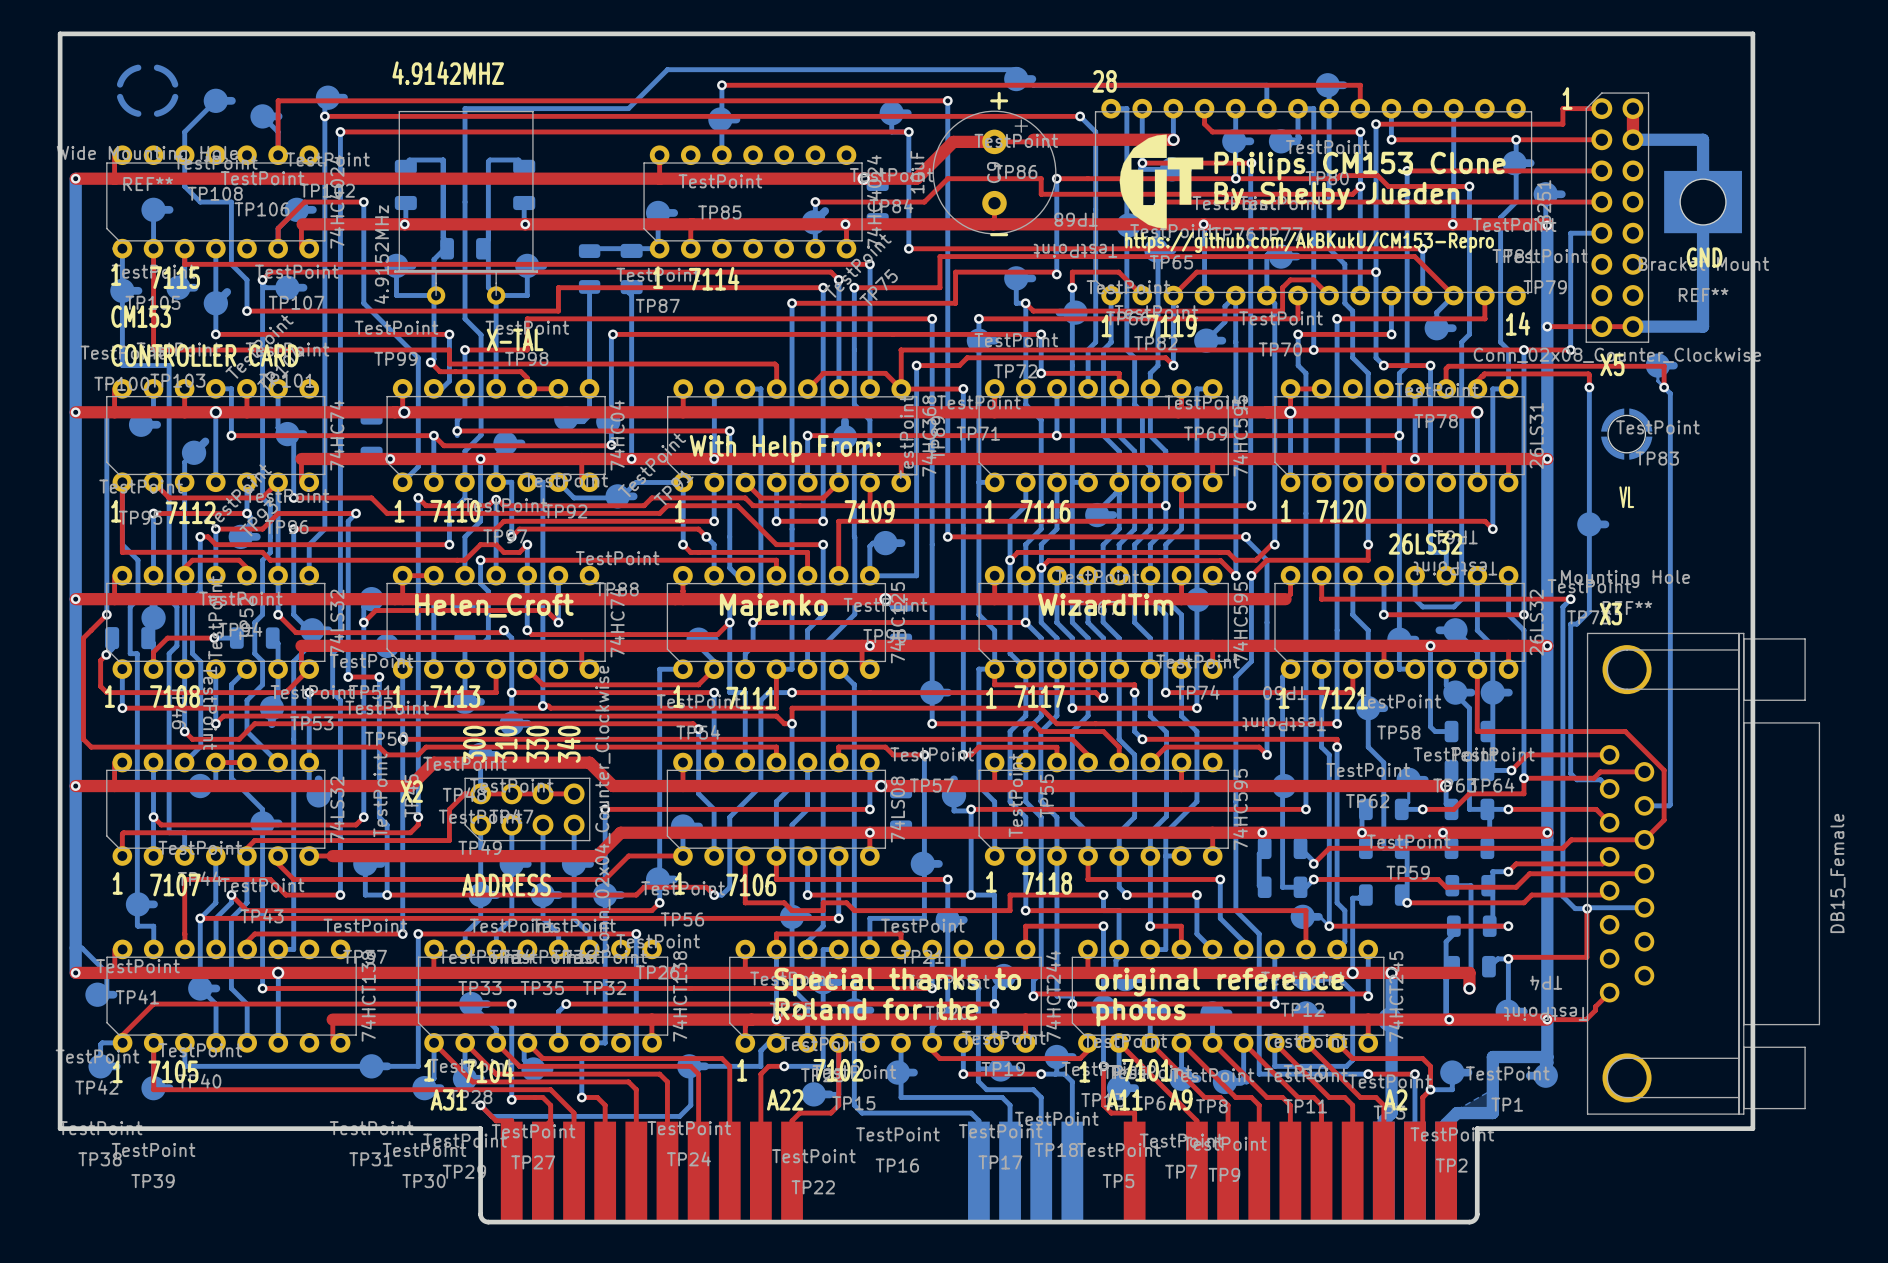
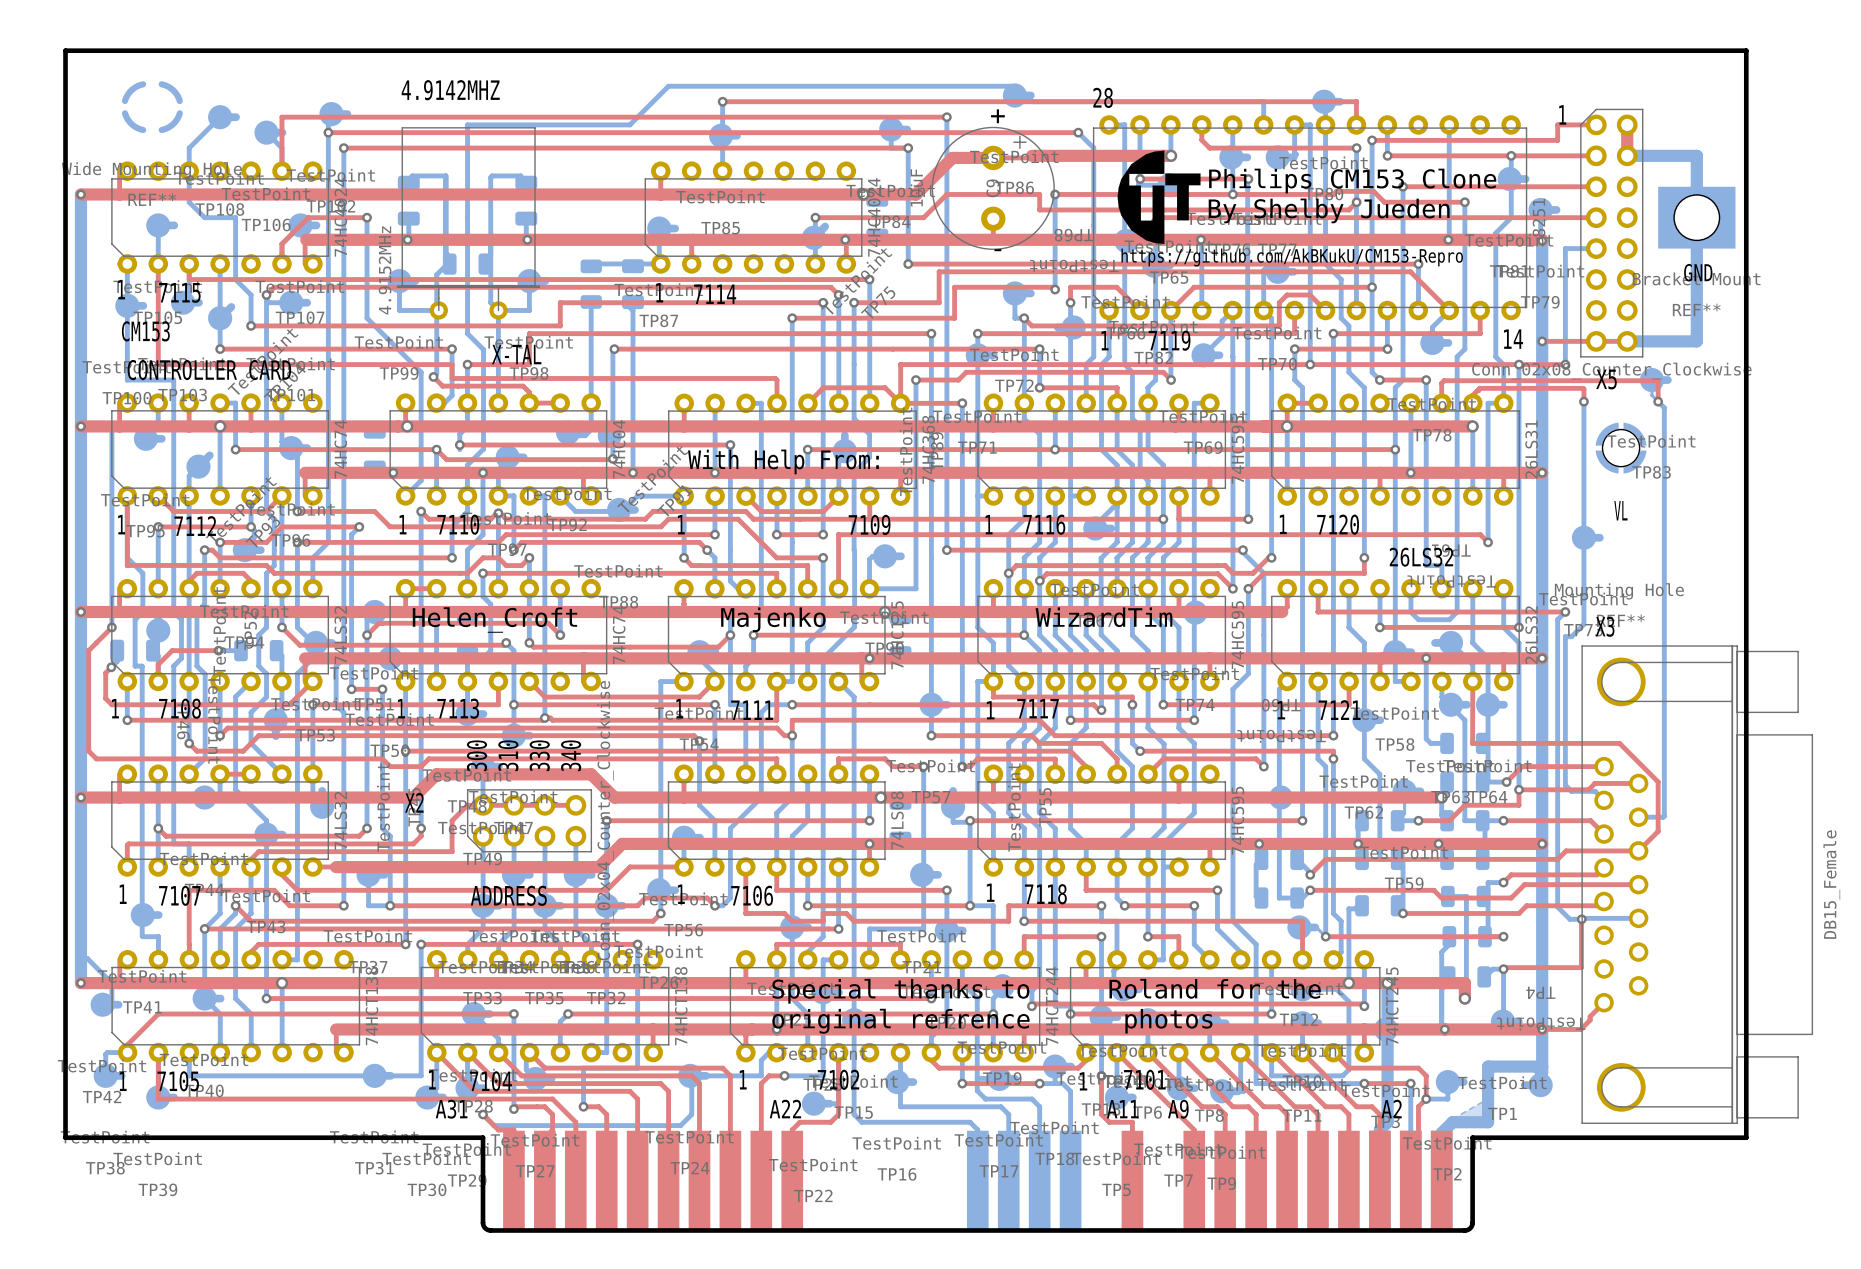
text: Special thanks to original reference (1059, 982) -> Special thanks to Roland for the (1046, 991)
text: Roland for the photos (980, 1012) -> original refrence photos (992, 1021)

